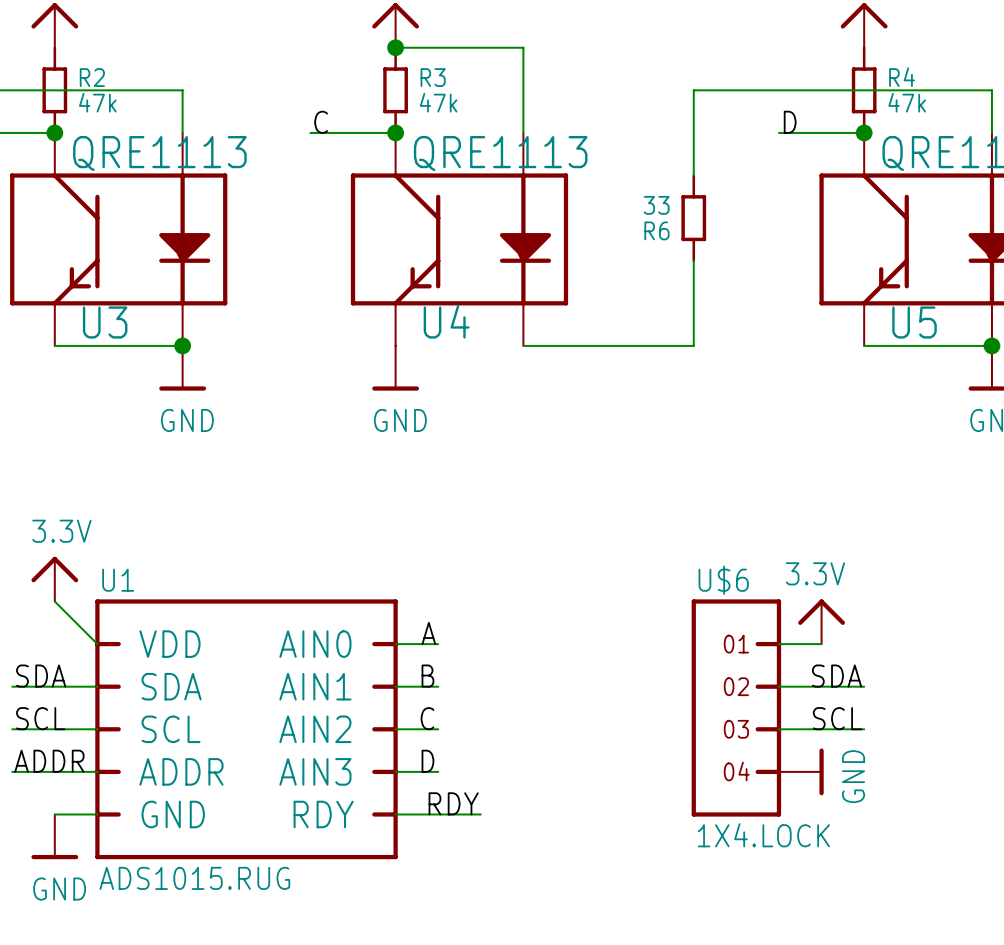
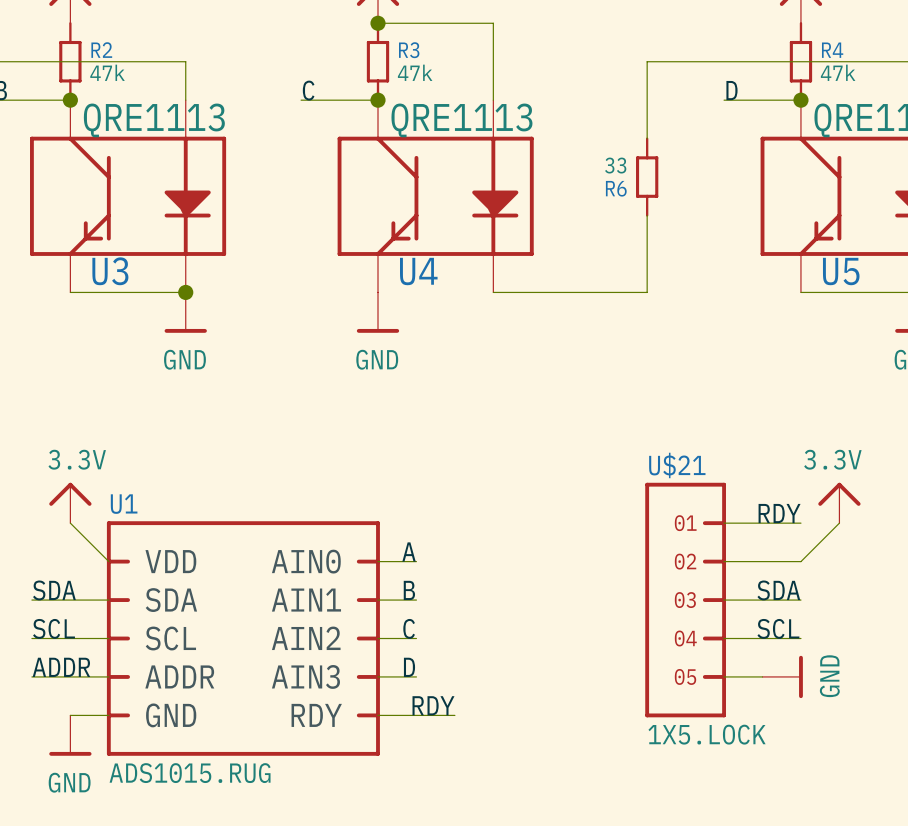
label: none -> RDY (779, 513)
wire: none -> (724, 523) (800, 523)
wire: none -> (839, 523) (800, 561) (762, 561)
power symbol position: 3.3V (821, 621) -> 3.3V (839, 502)
U$21: none -> 1X5.LOCK (685, 600)
U$6: 1X4.LOCK (736, 707) -> none
power symbol position: GND (801, 771) -> GND (782, 676)

